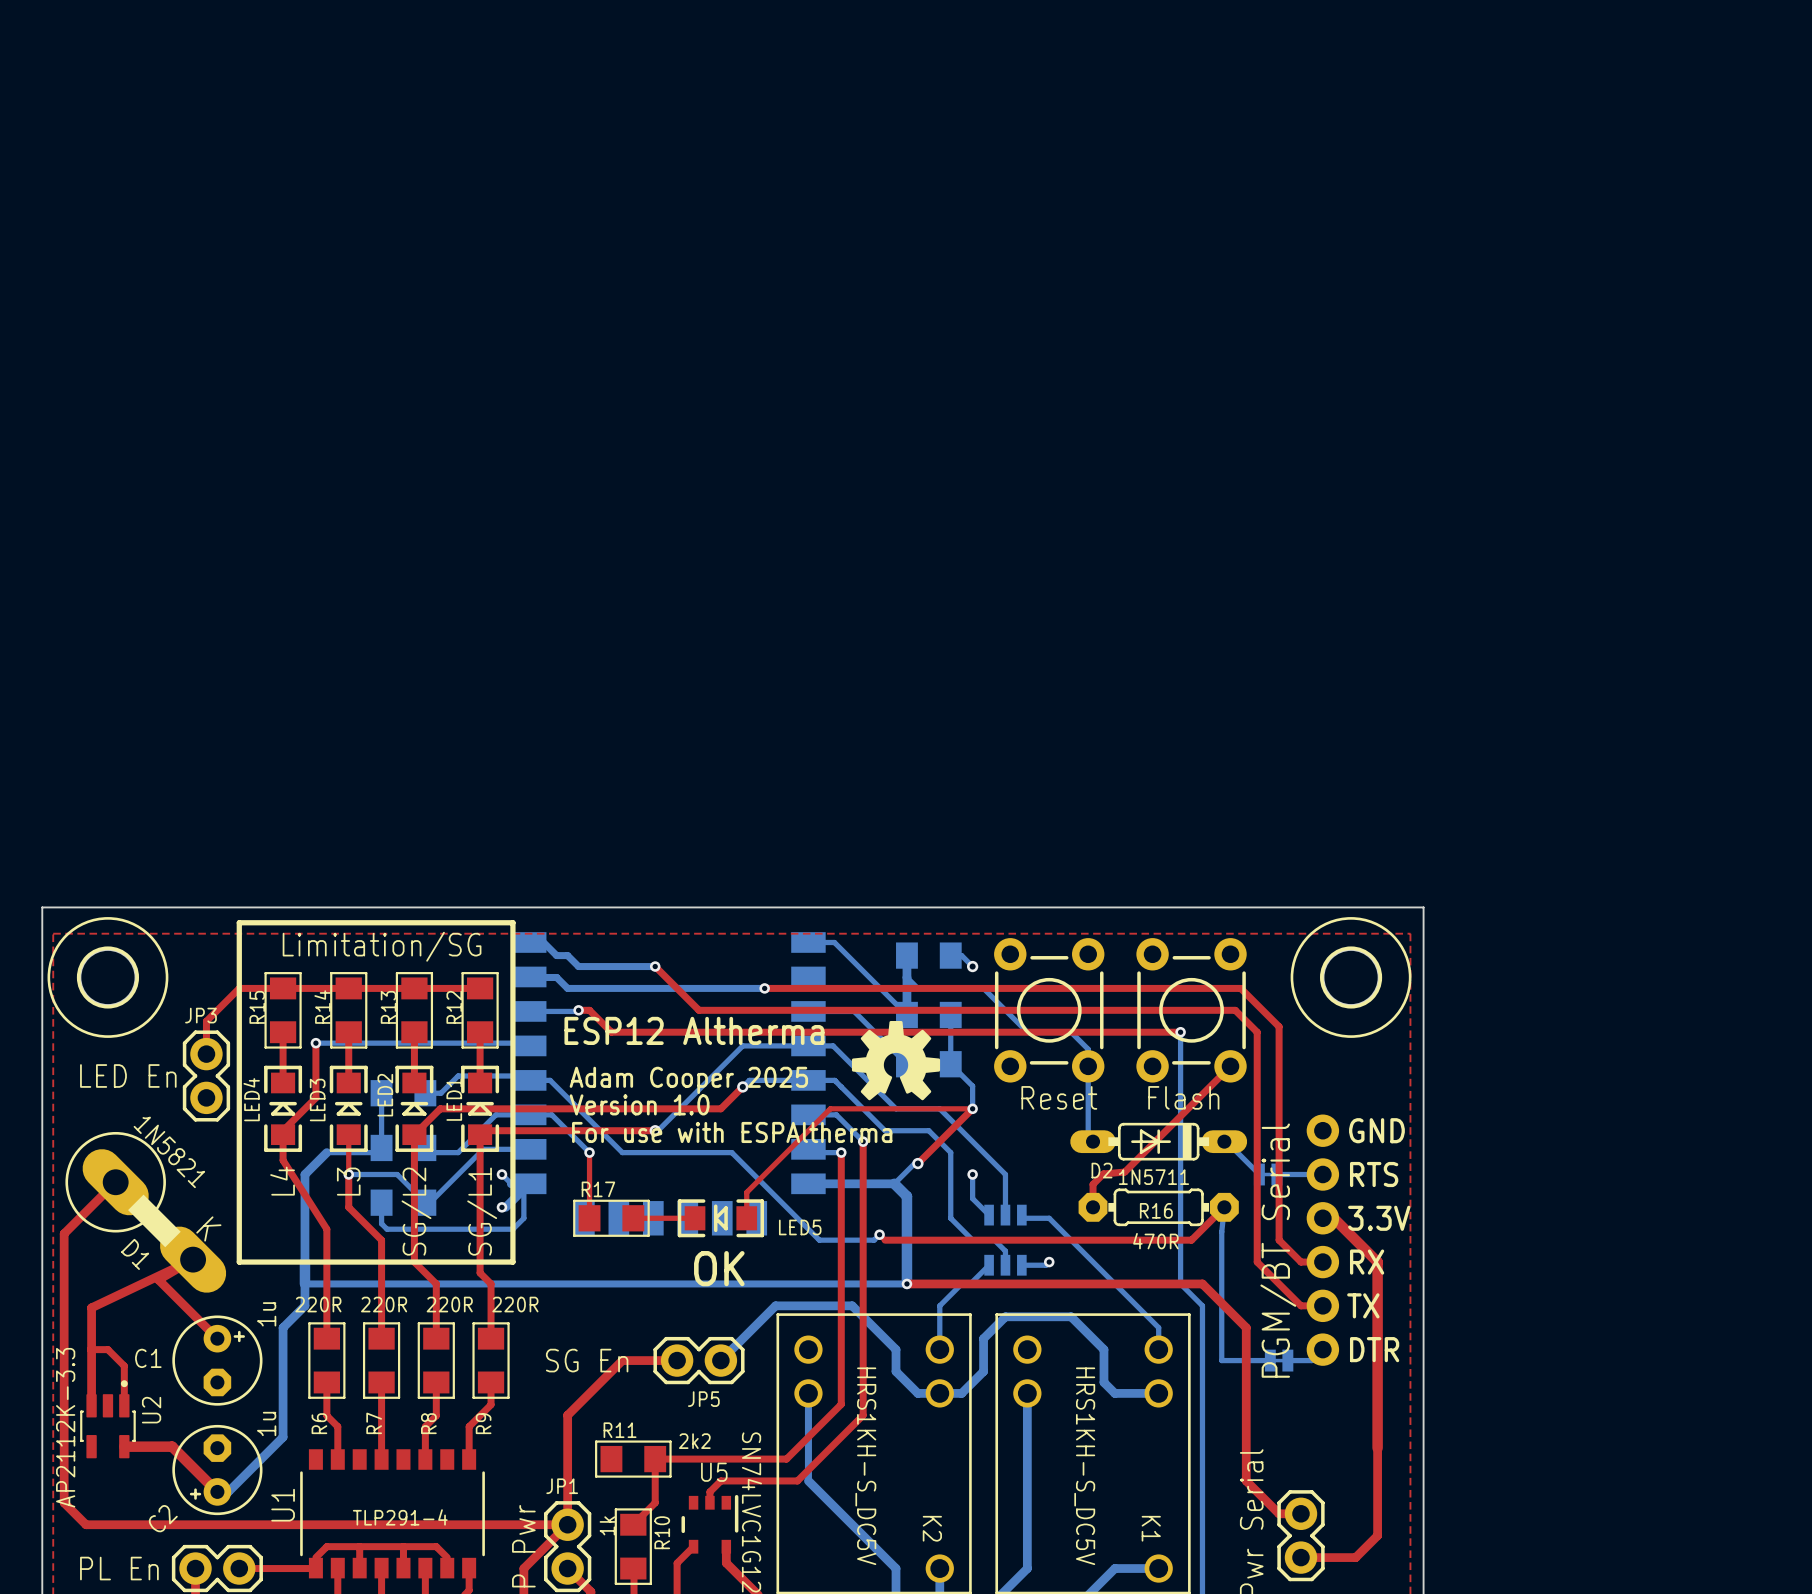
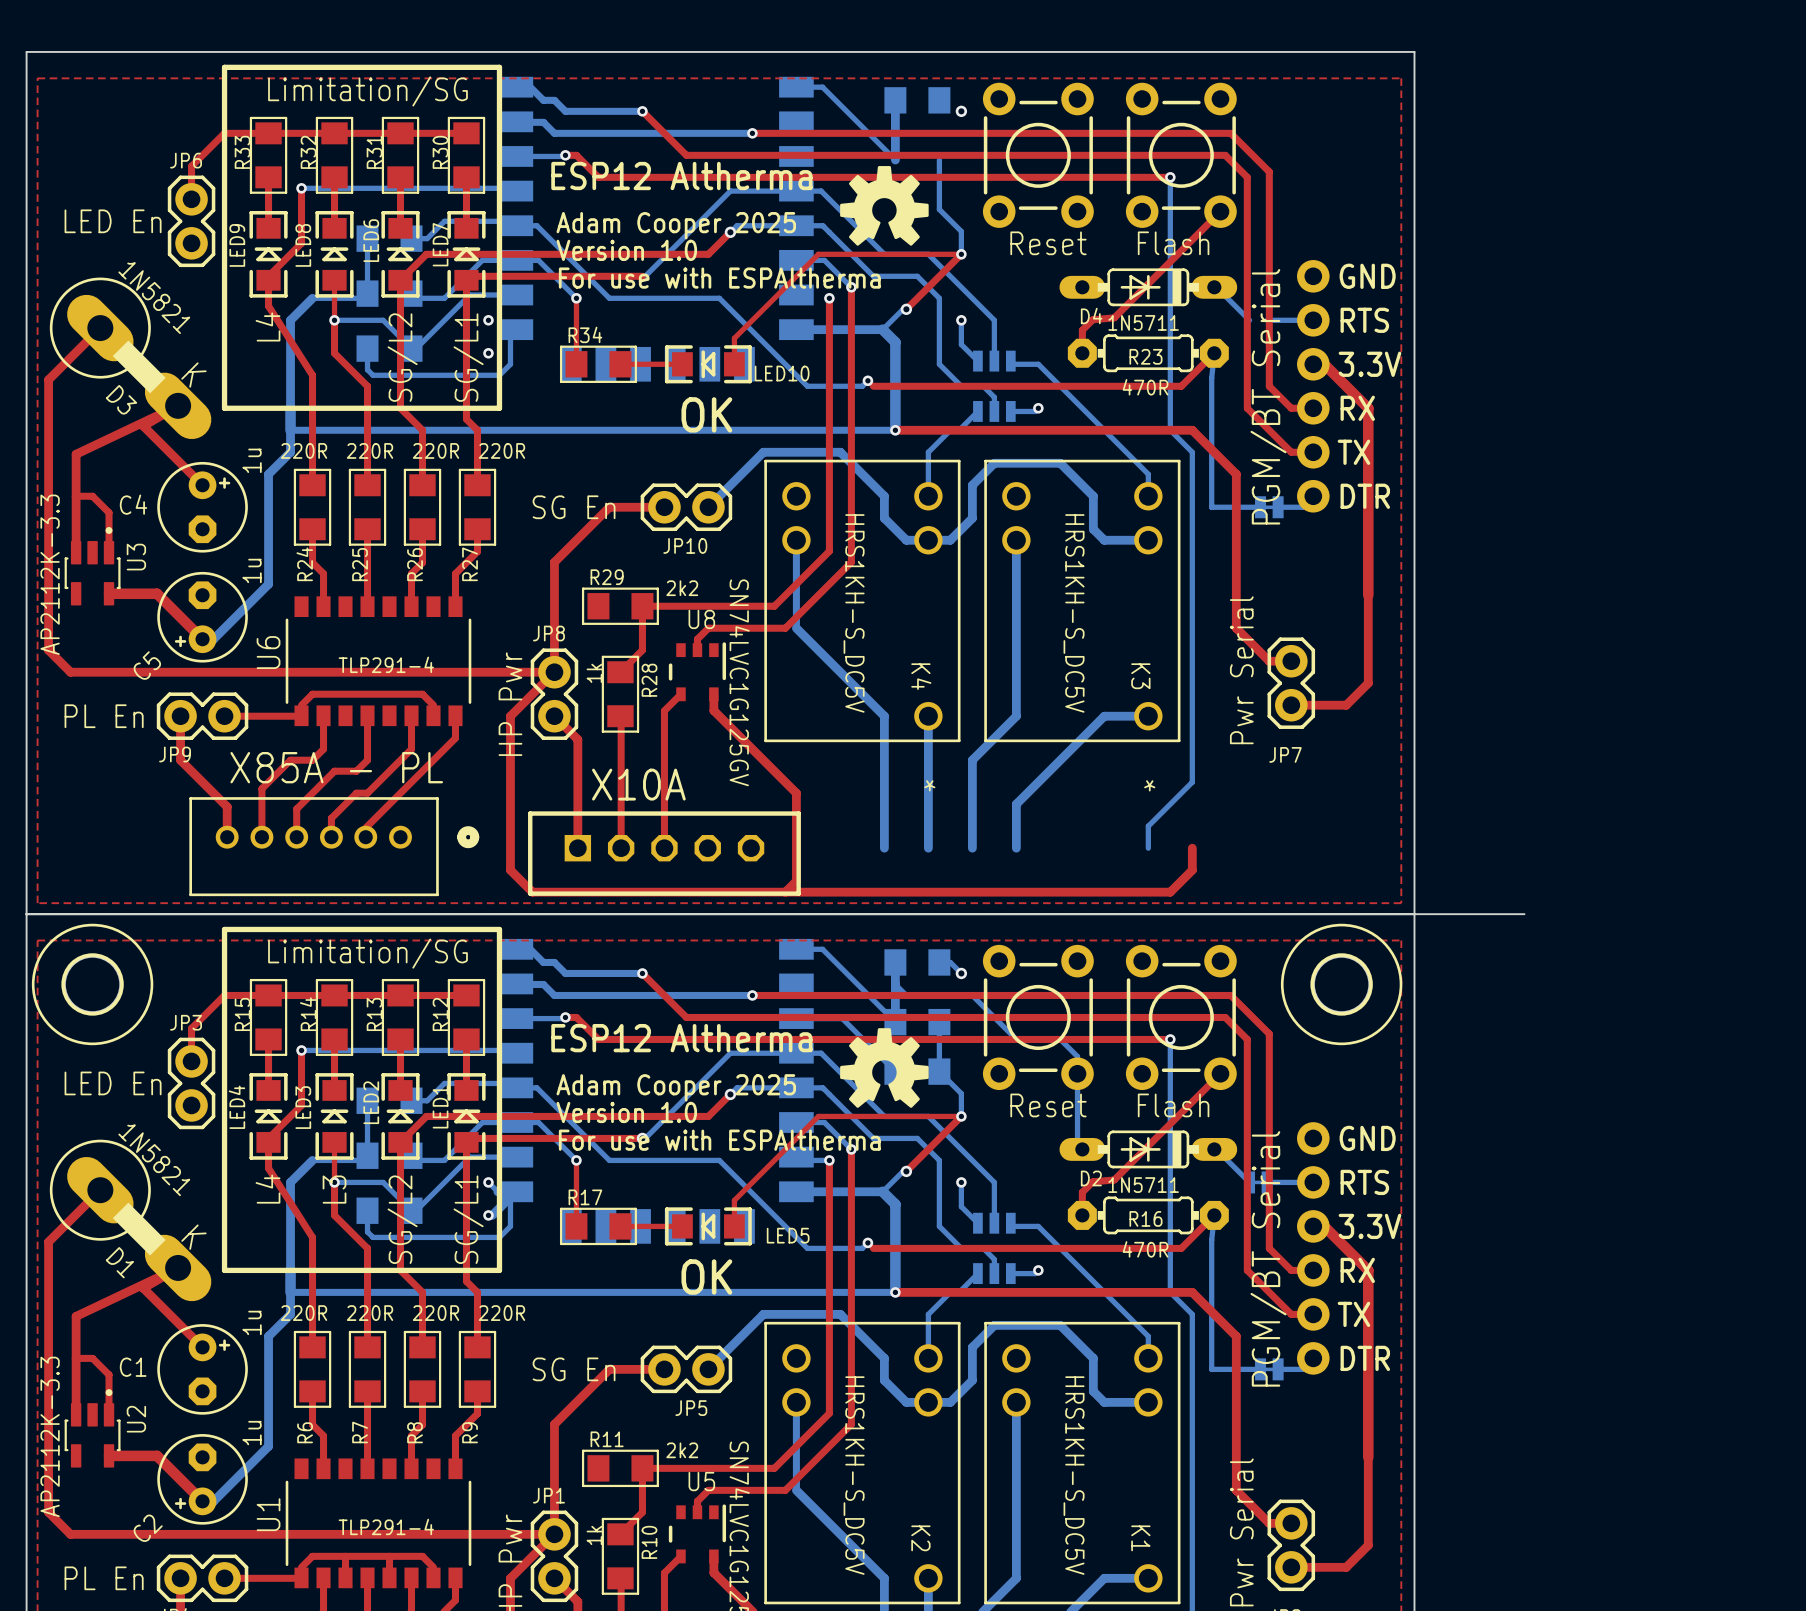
line: none -> (224, 67) (224, 408) (499, 408) (499, 67) (224, 67)
top zone outline: none -> (37, 78) (37, 903) (1401, 903) (1401, 78) (37, 78)
bottom track: none -> (515, 87) (530, 87) (543, 100) (554, 100) (565, 111) (642, 111)
bottom track: none -> (796, 87) (822, 87) (895, 160) (895, 100)
text: none -> Limitation/SG (367, 91)
part: none -> (917, 100)
top track: none -> (642, 111) (686, 155) (1225, 155) (1247, 177) (1247, 408) (1291, 452) (1313, 452)
via: none -> (642, 111)
via: none -> (961, 111)
bottom track: none -> (515, 121) (543, 122) (554, 133) (752, 133)
top track: none -> (466, 133) (224, 133) (191, 166) (191, 199)
top track: none -> (752, 133) (1230, 133) (1269, 171) (1269, 386) (1291, 408) (1313, 408)
via: none -> (752, 133)
R33: none -> (268, 155)
R32: none -> (334, 155)
R31: none -> (400, 155)
R30: none -> (466, 155)
bottom track: none -> (565, 155) (566, 156) (515, 156)
top track: none -> (565, 155) (576, 155) (598, 177) (1170, 177)
via: none -> (565, 155)
part: none -> Reset (1038, 155)
part: none -> Flash (1181, 155)
bottom track: none -> (939, 160) (939, 209) (961, 231) (961, 254)
drawing: none -> [840, 166, 929, 246]
text: none -> ESP12 Altherma (681, 176)
top track: none -> (268, 177) (268, 228)
top track: none -> (334, 177) (334, 228)
top track: none -> (400, 177) (400, 228)
top track: none -> (466, 177) (466, 228)
bottom track: none -> (1170, 177) (1170, 430) (1192, 452) (1192, 782) (1148, 826) (1148, 848)
via: none -> (1170, 177)
bottom track: none -> (301, 188) (513, 188) (515, 191)
top track: none -> (301, 188) (301, 243) (268, 276) (268, 306) (312, 375) (312, 485)
via: none -> (301, 188)
top track: none -> (1220, 211) (1114, 317) (1092, 319) (1082, 330) (1082, 353)
JP6: none -> LED En (191, 221)
text: none -> Adam Cooper 2025 (676, 225)
part: none -> (656, 229)
bottom track: none -> (730, 232) (737, 225) (822, 225) (873, 276) (917, 276) (939, 298) (939, 364) (961, 386) (983, 386) (994, 397) (994, 411)
top track: none -> (730, 232) (708, 254) (426, 254) (400, 280) (400, 408) (422, 430) (422, 485)
via: none -> (730, 232)
bottom track: none -> (367, 238) (367, 293) (362, 298) (312, 298) (290, 320) (290, 430)
part: none -> (389, 238)
bottom track: none -> (411, 238) (427, 238) (444, 221) (511, 221) (515, 225) (536, 225) (609, 298) (719, 298) (807, 386) (862, 386) (867, 380)
text: none -> Version 1.0 (626, 250)
LED9: none -> (268, 254)
LED8: none -> (334, 254)
LED6: none -> (400, 254)
LED7: none -> (466, 254)
via: none -> (961, 254)
bottom track: none -> (796, 260) (824, 260) (851, 287)
bottom track: none -> (642, 276) (645, 276) (730, 191) (821, 191) (884, 254) (928, 254) (994, 320) (994, 361)
top track: none -> (642, 276) (470, 276) (466, 280) (466, 419) (477, 430) (477, 485)
text: none -> GND (1367, 276)
text: none -> For use with ESPAltherma (719, 278)
top track: none -> (334, 280) (334, 353) (367, 386) (367, 485)
top track: none -> (851, 287) (851, 562) (785, 628) (708, 628) (697, 639) (697, 650)
via: none -> (851, 287)
D4: none -> 1N5711 (1148, 287)
bottom track: none -> (1214, 287) (1216, 287) (1249, 320)
part: none -> (389, 293)
bottom track: none -> (411, 293) (416, 298) (444, 298) (482, 260) (538, 260) (576, 298)
bottom track: none -> (515, 295) (469, 295) (416, 348) (411, 348) (383, 320) (334, 320)
top track: none -> (576, 298) (576, 364)
via: none -> (576, 298)
top track: none -> (829, 298) (829, 551) (774, 606) (642, 606) (642, 650) (620, 672)
via: none -> (829, 298)
bottom track: none -> (906, 309) (903, 309) (882, 329)
top track: none -> (906, 309) (961, 254) (818, 254) (734, 338) (734, 364)
via: none -> (906, 309)
via: none -> (334, 320)
via: none -> (488, 320)
bottom track: none -> (961, 320) (961, 344) (977, 361)
via: none -> (961, 320)
bottom track: none -> (1267, 320) (1313, 320)
text: none -> RTS (1364, 320)
text: none -> L4 (268, 326)
top track: none -> (100, 328) (48, 379) (48, 650) (70, 672) (554, 672)
bottom track: none -> (510, 329) (510, 364) (499, 375) (373, 375) (367, 369) (367, 348)
bottom track: none -> (796, 329) (882, 329)
bottom track: none -> (882, 329) (895, 342) (895, 430) (290, 430)
part: none -> (389, 348)
via: none -> (488, 353)
R23: none -> 470R (1148, 353)
bottom track: none -> (1214, 353) (1211, 377) (1211, 507) (1260, 507)
top track: none -> (1214, 353) (1181, 386) (873, 386) (867, 380)
text: none -> SG/L2 (402, 357)
text: none -> SG/L1 (468, 357)
D3: none -> 1N5821 (130, 358)
bottom track: none -> (1010, 361) (1014, 364) (1038, 364) (1148, 474) (1148, 496)
R34: none -> (598, 364)
top track: none -> (620, 364) (682, 364)
LED10: none -> (708, 364)
top track: none -> (1313, 364) (1324, 364) (1368, 408) (1368, 683) (1346, 705) (1291, 705)
text: none -> 3.3V (1369, 364)
via: none -> (867, 380)
part: none -> (994, 386)
part: none -> PGM/BT Serial (1313, 386)
bottom track: none -> (1038, 408) (1035, 411) (1010, 411)
via: none -> (1038, 408)
text: none -> RX (1357, 408)
bottom track: none -> (977, 411) (959, 430) (950, 430) (928, 452) (928, 496)
text: none -> OK (706, 414)
bottom track: none -> (290, 430) (290, 452) (268, 474) (268, 584) (213, 639) (202, 639)
top track: none -> (895, 430) (1192, 430) (1236, 474) (1236, 628) (1269, 661) (1291, 661)
via: none -> (895, 430)
text: none -> TX (1353, 452)
top track: none -> (202, 485) (143, 426) (178, 405) (76, 454) (76, 552)
top track: none -> (76, 496) (92, 496) (109, 512) (109, 552)
bottom track: none -> (1313, 496) (1302, 507) (1278, 507)
text: none -> DTR (1365, 496)
C4: none -> 1u (202, 507)
R24: none -> 220R (312, 507)
R25: none -> 220R (367, 507)
R26: none -> 220R (422, 507)
R27: none -> 220R (477, 507)
top track: none -> (664, 507) (609, 507) (554, 562) (554, 672)
JP10: none -> SG En (686, 507)
bottom track: none -> (708, 507) (763, 452) (840, 452) (884, 496) (884, 518) (906, 540) (950, 540) (972, 518) (972, 485) (994, 463) (1060, 463) (1093, 496) (1093, 529) (1104, 540) (1148, 540)
part: none -> (1269, 507)
top track: none -> (312, 529) (312, 562) (323, 573) (323, 606)
top track: none -> (367, 529) (367, 606)
top track: none -> (422, 529) (422, 562) (411, 573) (411, 606)
top track: none -> (477, 529) (477, 551) (455, 573) (455, 606)
bottom track: none -> (796, 540) (796, 628) (884, 716) (884, 848)
bottom track: none -> (1016, 540) (1016, 716) (972, 760) (972, 848)
U3: none -> AP2112K-3.3 (92, 566)
top track: none -> (109, 593) (157, 593) (202, 639)
K4: none -> HRS1KH-S_DC5V (862, 600)
K3: none -> HRS1KH-S_DC5V (1082, 600)
R29: none -> 2k2 (620, 606)
C5: none -> 1u (202, 617)
U6: none -> TLP291-4 (378, 661)
top track: none -> (554, 672) (510, 716) (510, 870) (532, 892) (1170, 892) (1192, 870) (1192, 848)
U8: none -> SN74LVC1G125GV (697, 671)
JP7: none -> Pwr Serial (1291, 683)
JP8: none -> HP Pwr (554, 694)
R28: none -> 1k (620, 694)
top track: none -> (680, 694) (664, 710) (664, 848)
top track: none -> (713, 694) (713, 710) (796, 793) (796, 881) (785, 892)
top track: none -> (180, 716) (180, 760) (227, 806) (227, 837)
JP9: none -> PL En (202, 716)
top track: none -> (323, 715) (323, 749) (312, 760) (290, 760) (261, 788) (261, 837)
top track: none -> (367, 715) (367, 760) (356, 771) (334, 771) (296, 809) (296, 837)
top track: none -> (411, 715) (411, 749) (367, 793) (356, 793) (331, 818) (331, 837)
top track: none -> (433, 715) (433, 705) (422, 694) (312, 694) (301, 705) (301, 716) (224, 716)
top track: none -> (455, 715) (455, 738) (365, 827) (365, 837)
top track: none -> (554, 716) (577, 739) (577, 848)
top track: none -> (620, 716) (621, 848)
bottom track: none -> (928, 716) (928, 848)
bottom track: none -> (1148, 716) (1104, 716) (1016, 804) (1016, 848)
part: none -> X85A - PL (334, 846)
part: none -> X10A (664, 853)
board edge: none -> (26, 914) (26, 51) (1414, 51) (1414, 914) (1524, 914)

